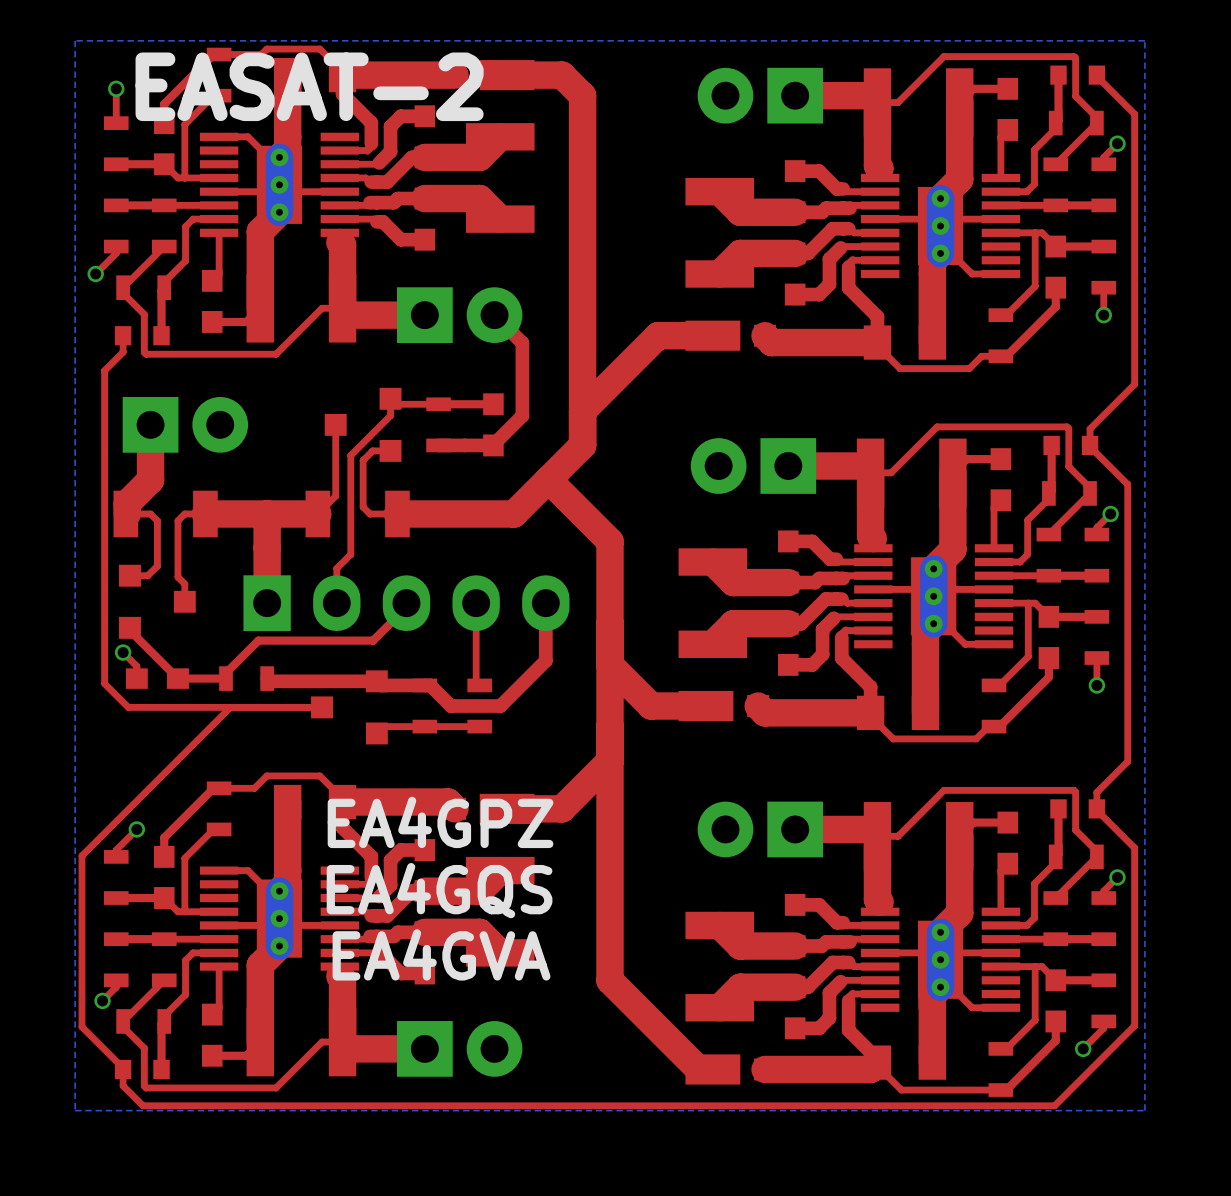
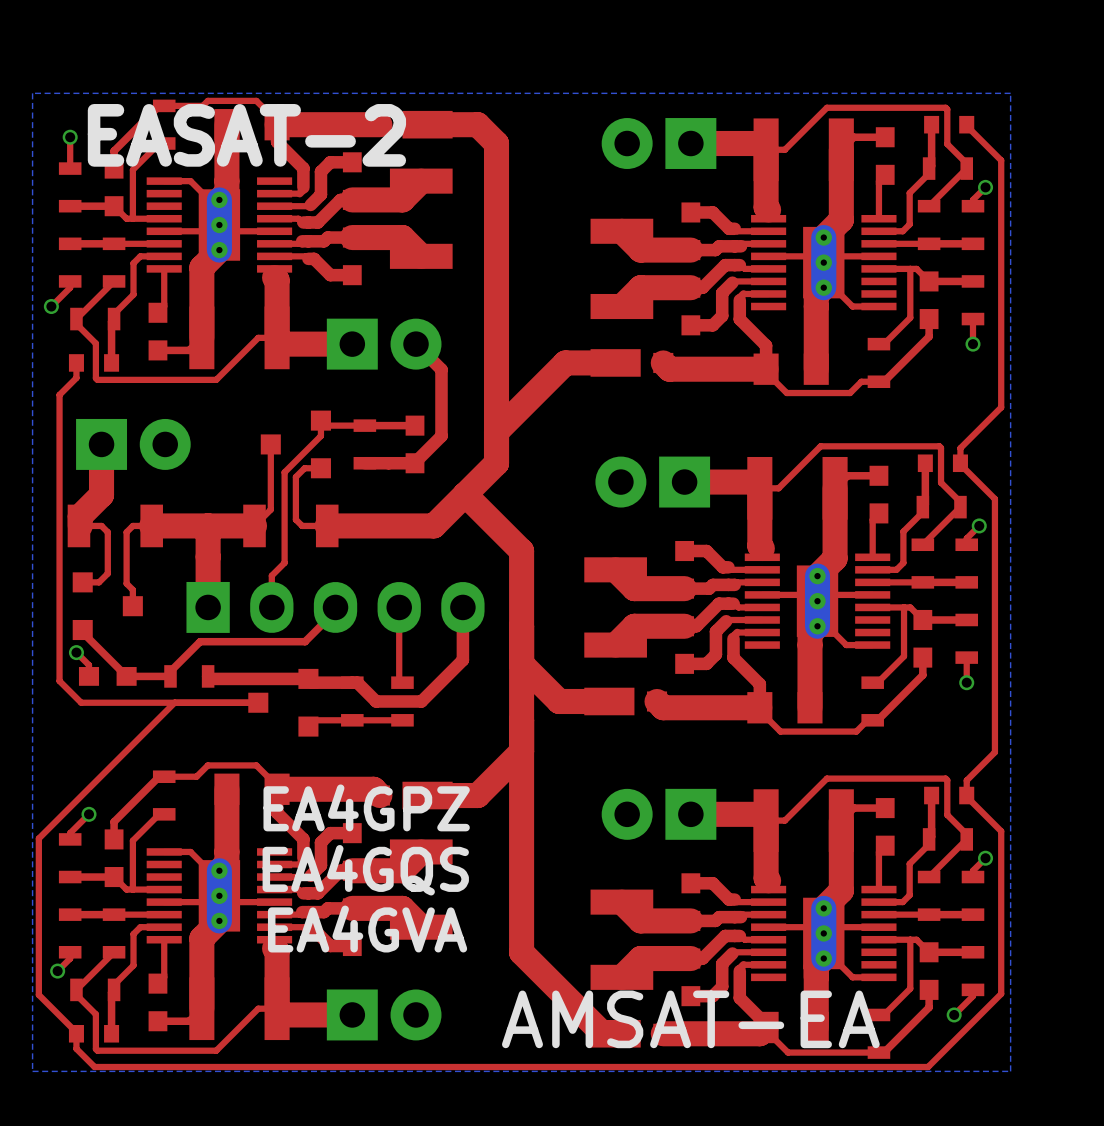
text: none -> AMSAT-EA (690, 1019)

